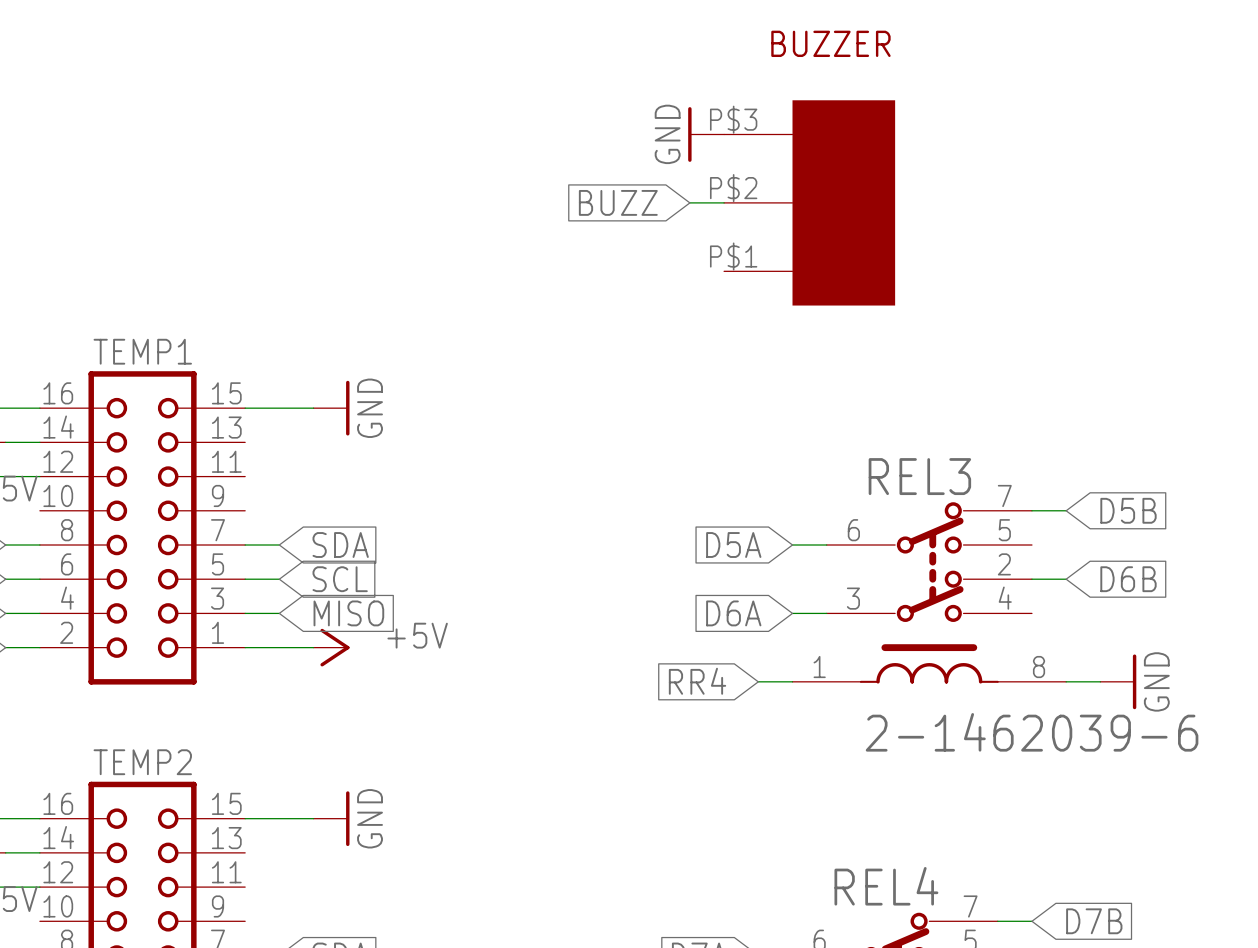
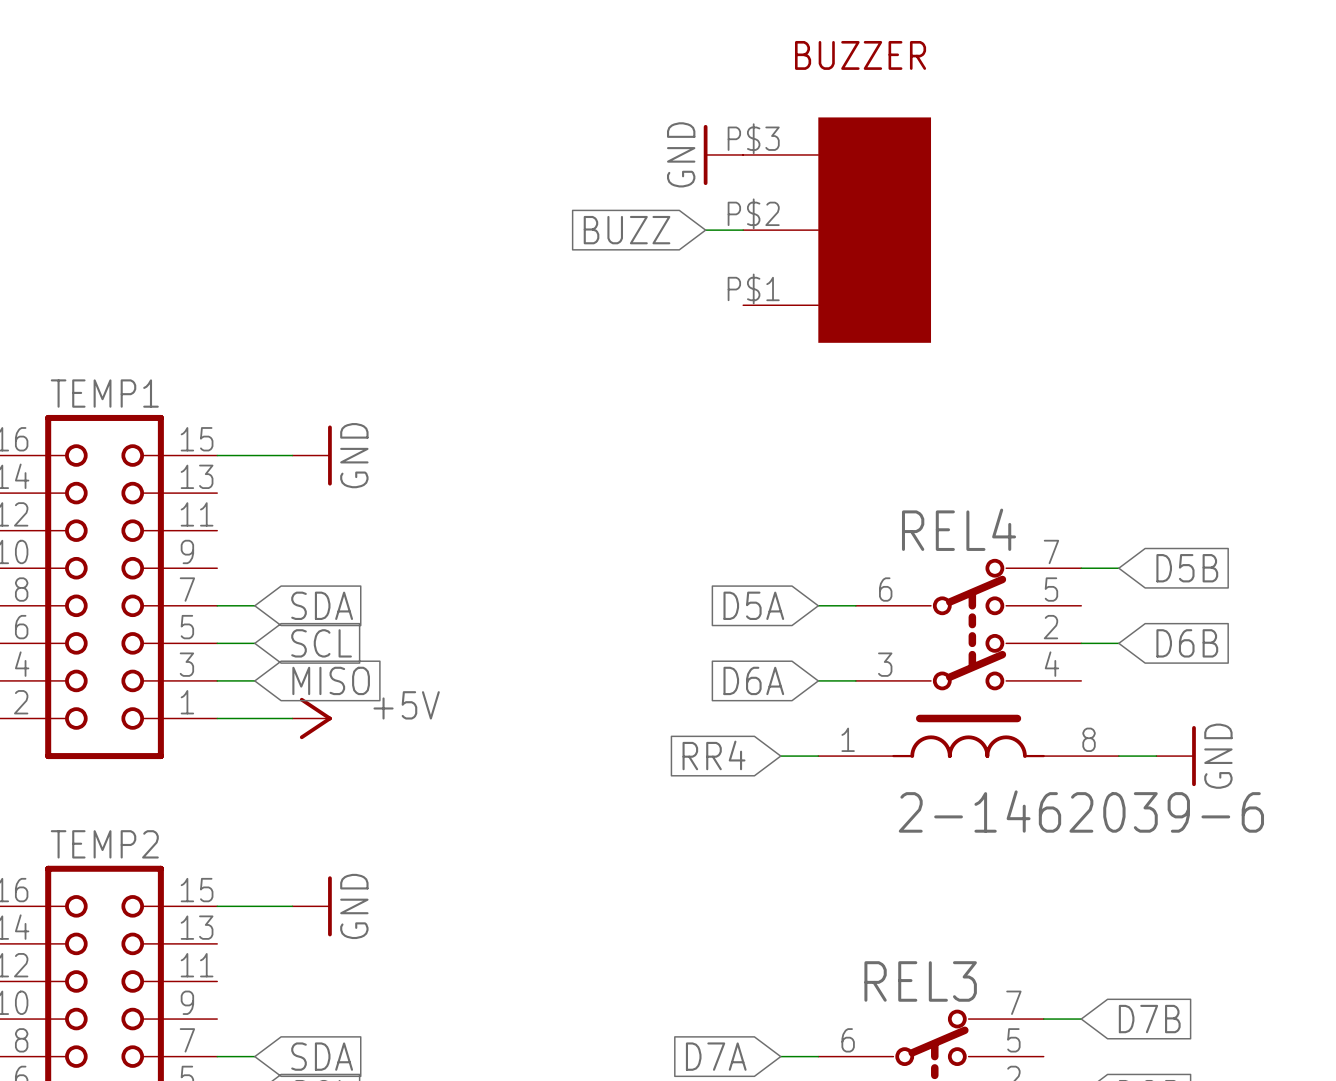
REL3 name: REL3 (919, 476) -> REL4 (959, 529)
REL4 name: REL4 (886, 886) -> REL3 (920, 981)

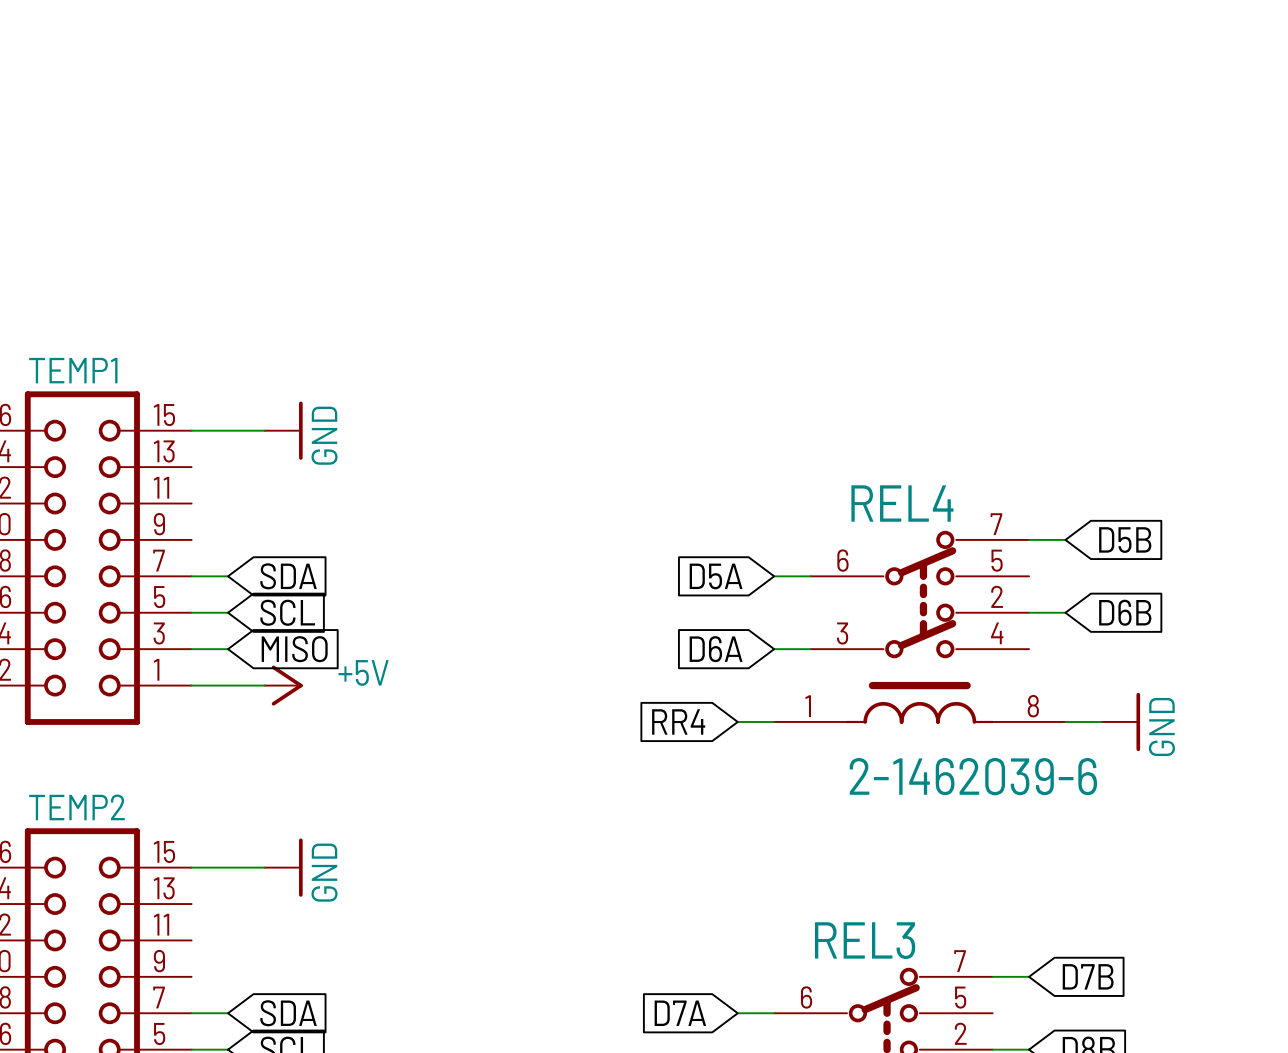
power symbol: GND (723, 154) -> none
global label: BUZZ (627, 230) -> none
wire: (705, 230) (743, 230) -> none
BUZZER: (837, 230) -> none

